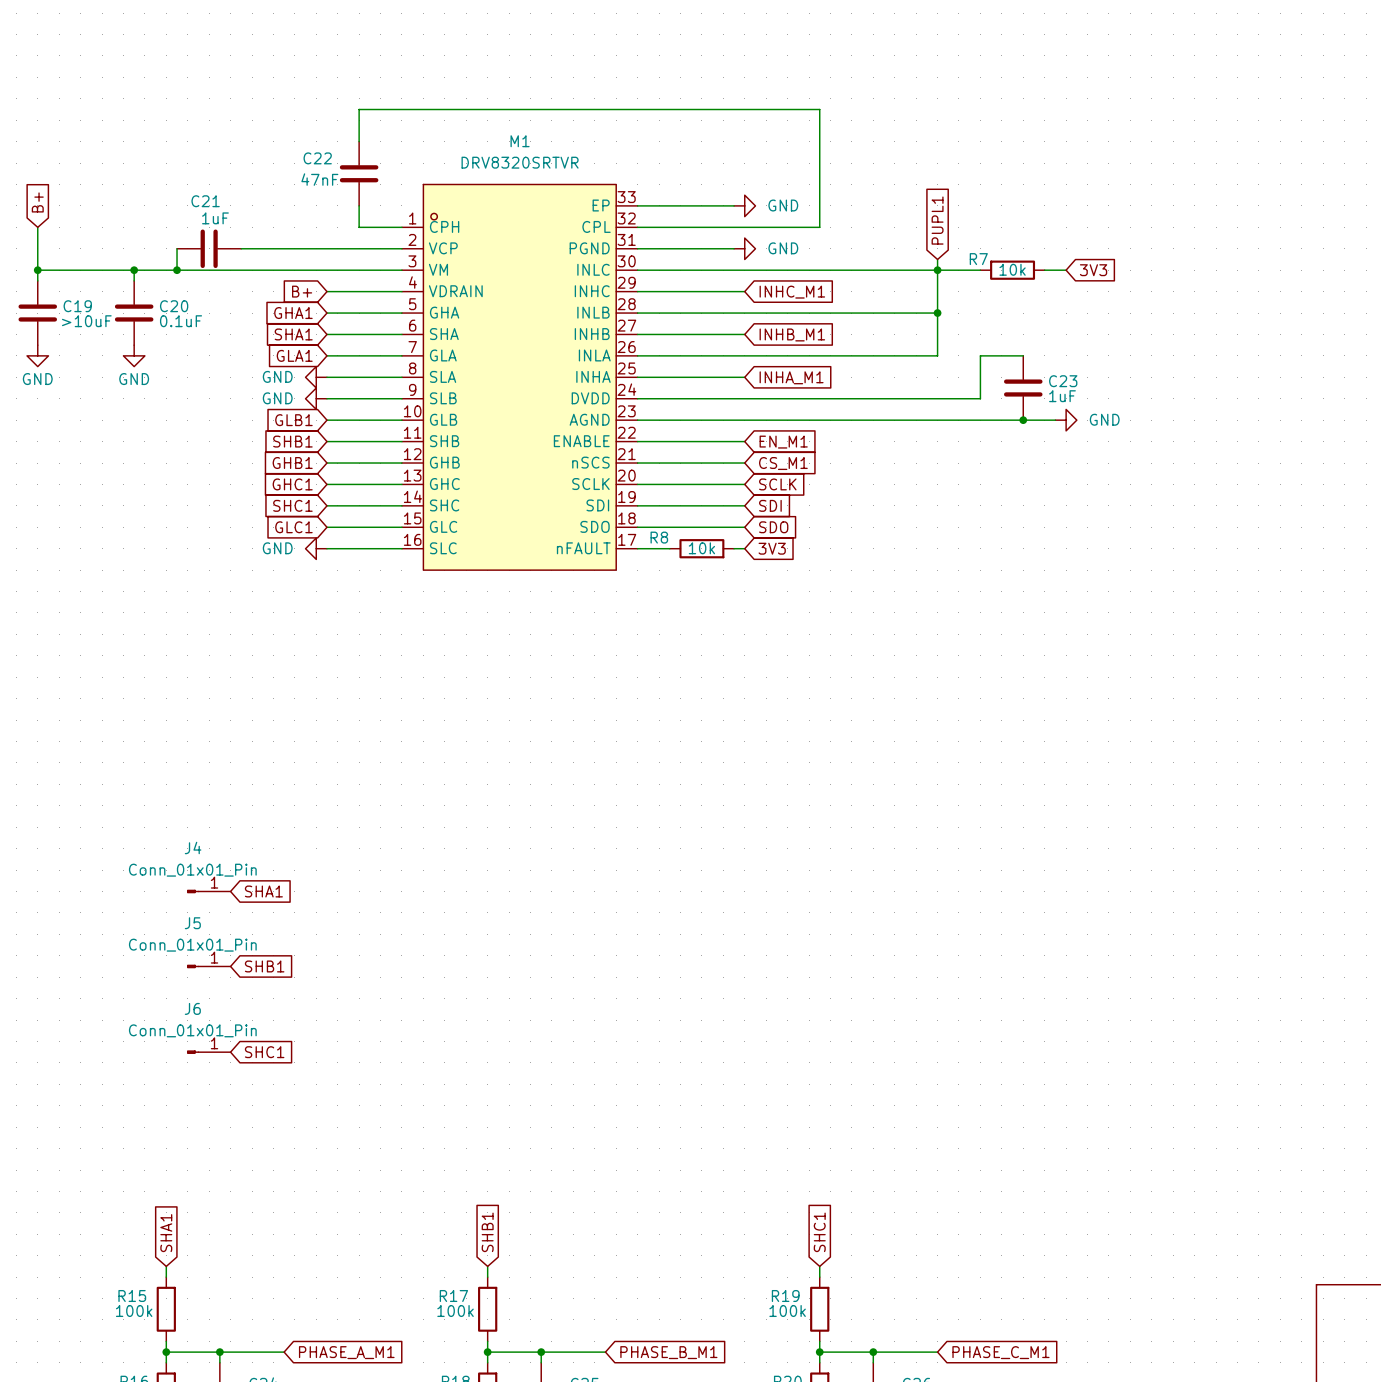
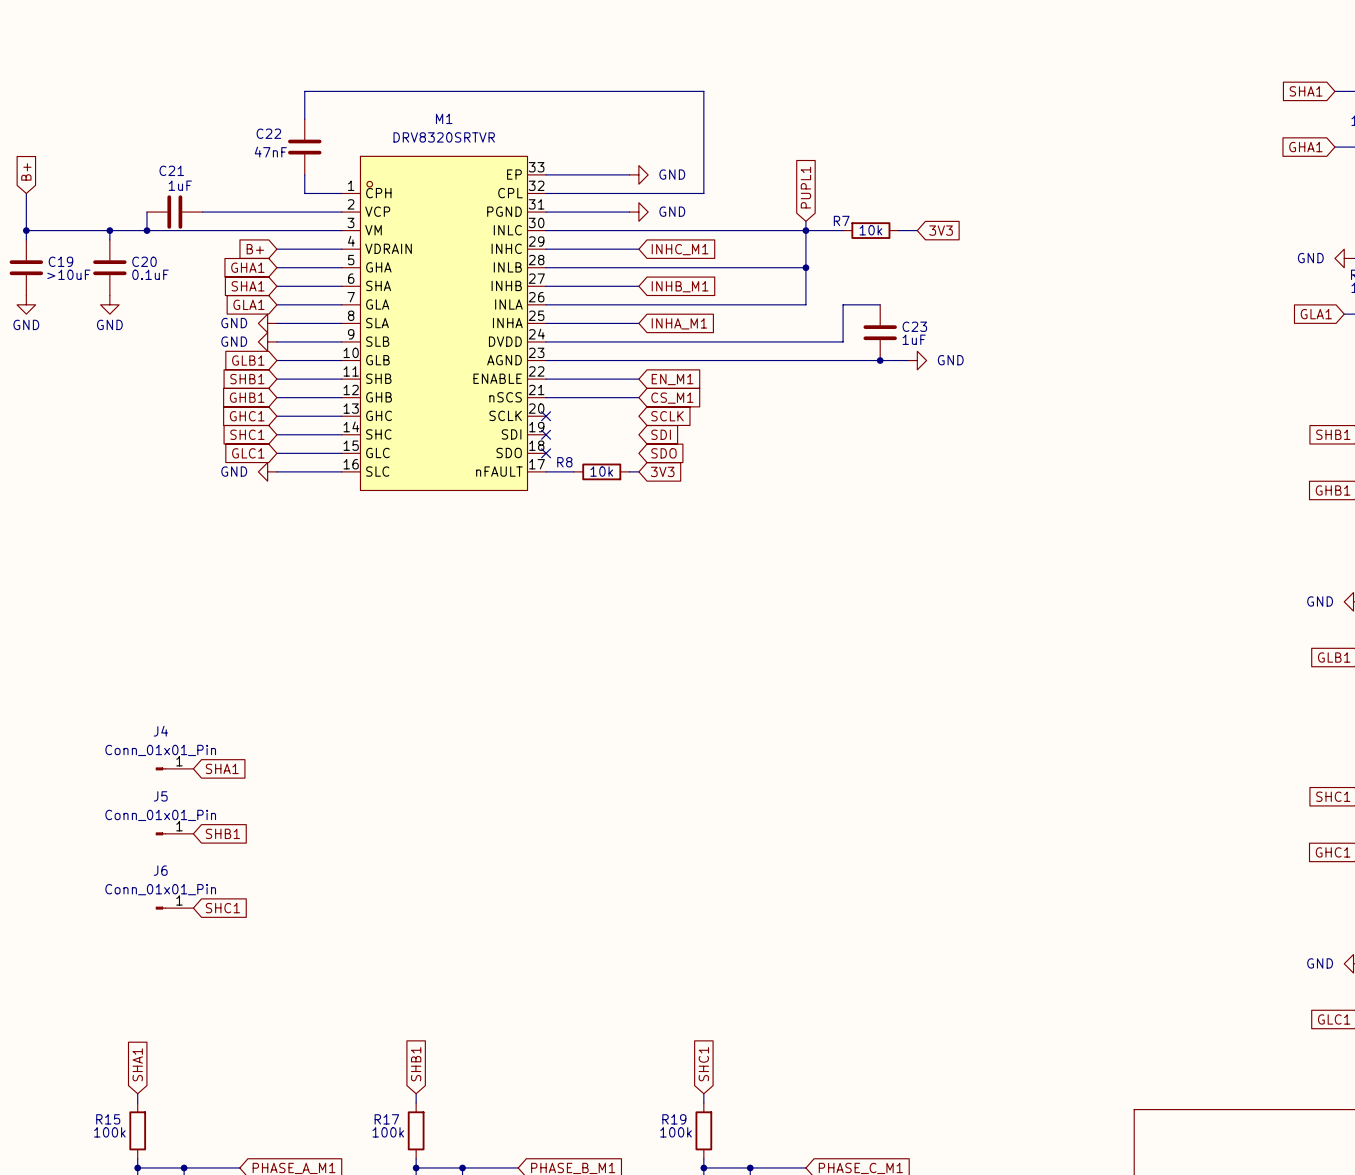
wire: (637, 484) (744, 484) -> none
no-connect mark: none -> (546, 416)
wire: (637, 505) (744, 505) -> none
no-connect mark: none -> (546, 434)
wire: (637, 527) (744, 527) -> none
no-connect mark: none -> (546, 453)

